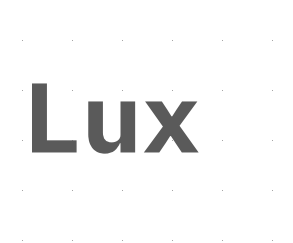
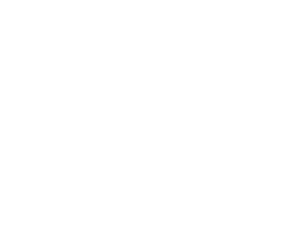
text: Lux (115, 118) -> none

